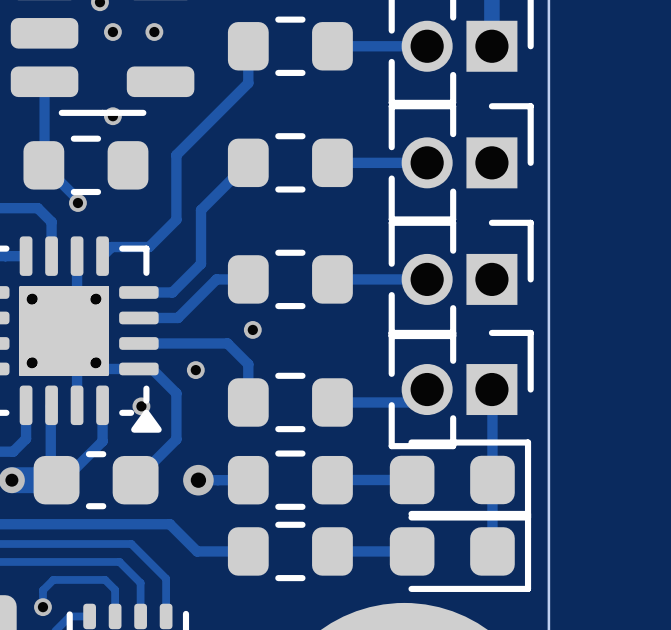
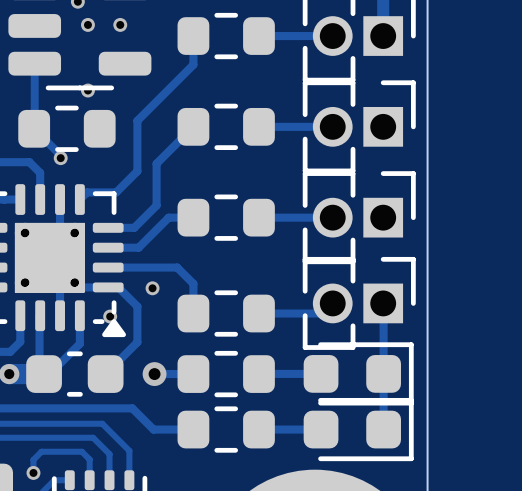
via: (252, 329) -> none

